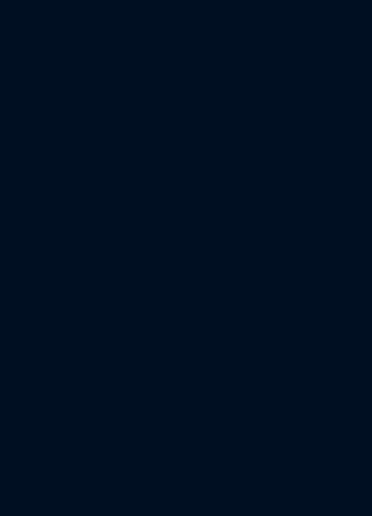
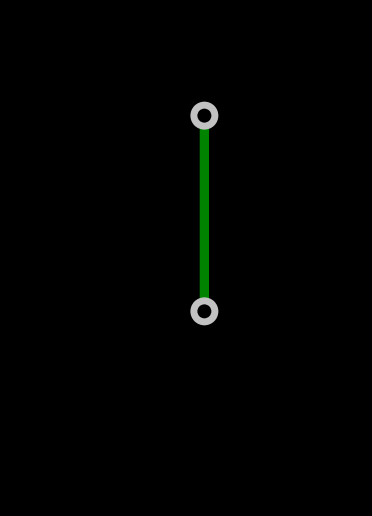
track: none -> (204, 115) (204, 311)
via: none -> (204, 115)
via: none -> (204, 311)

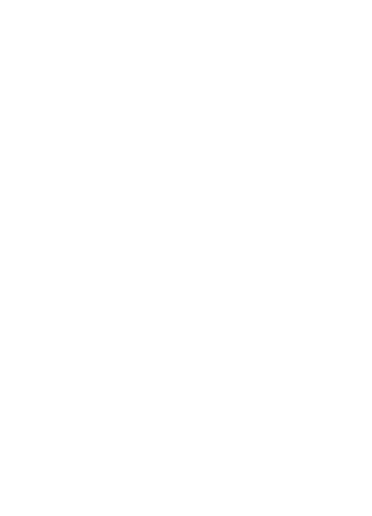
track: (204, 115) (204, 311) -> none
via: (204, 115) -> none
via: (204, 311) -> none

